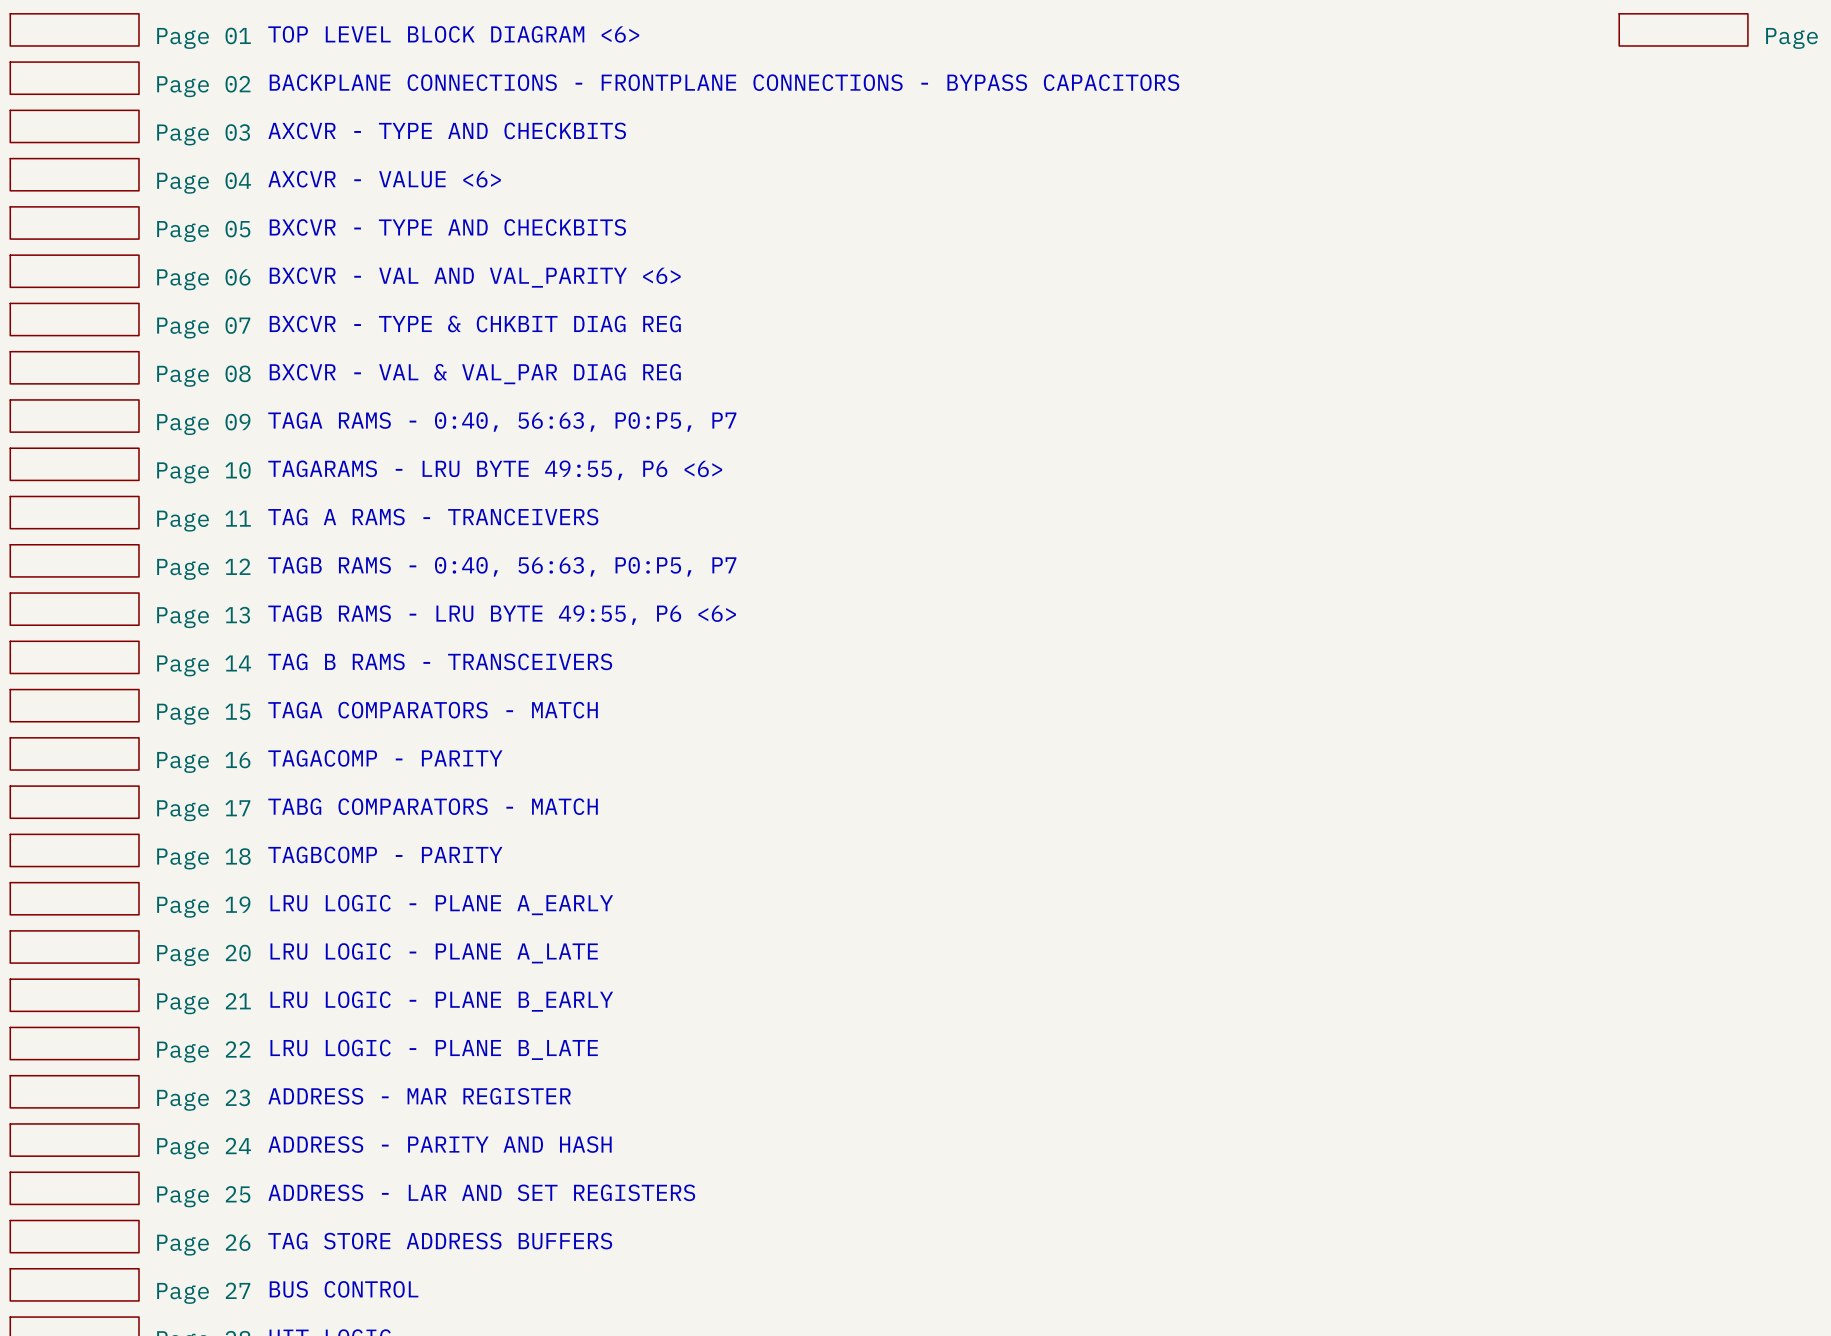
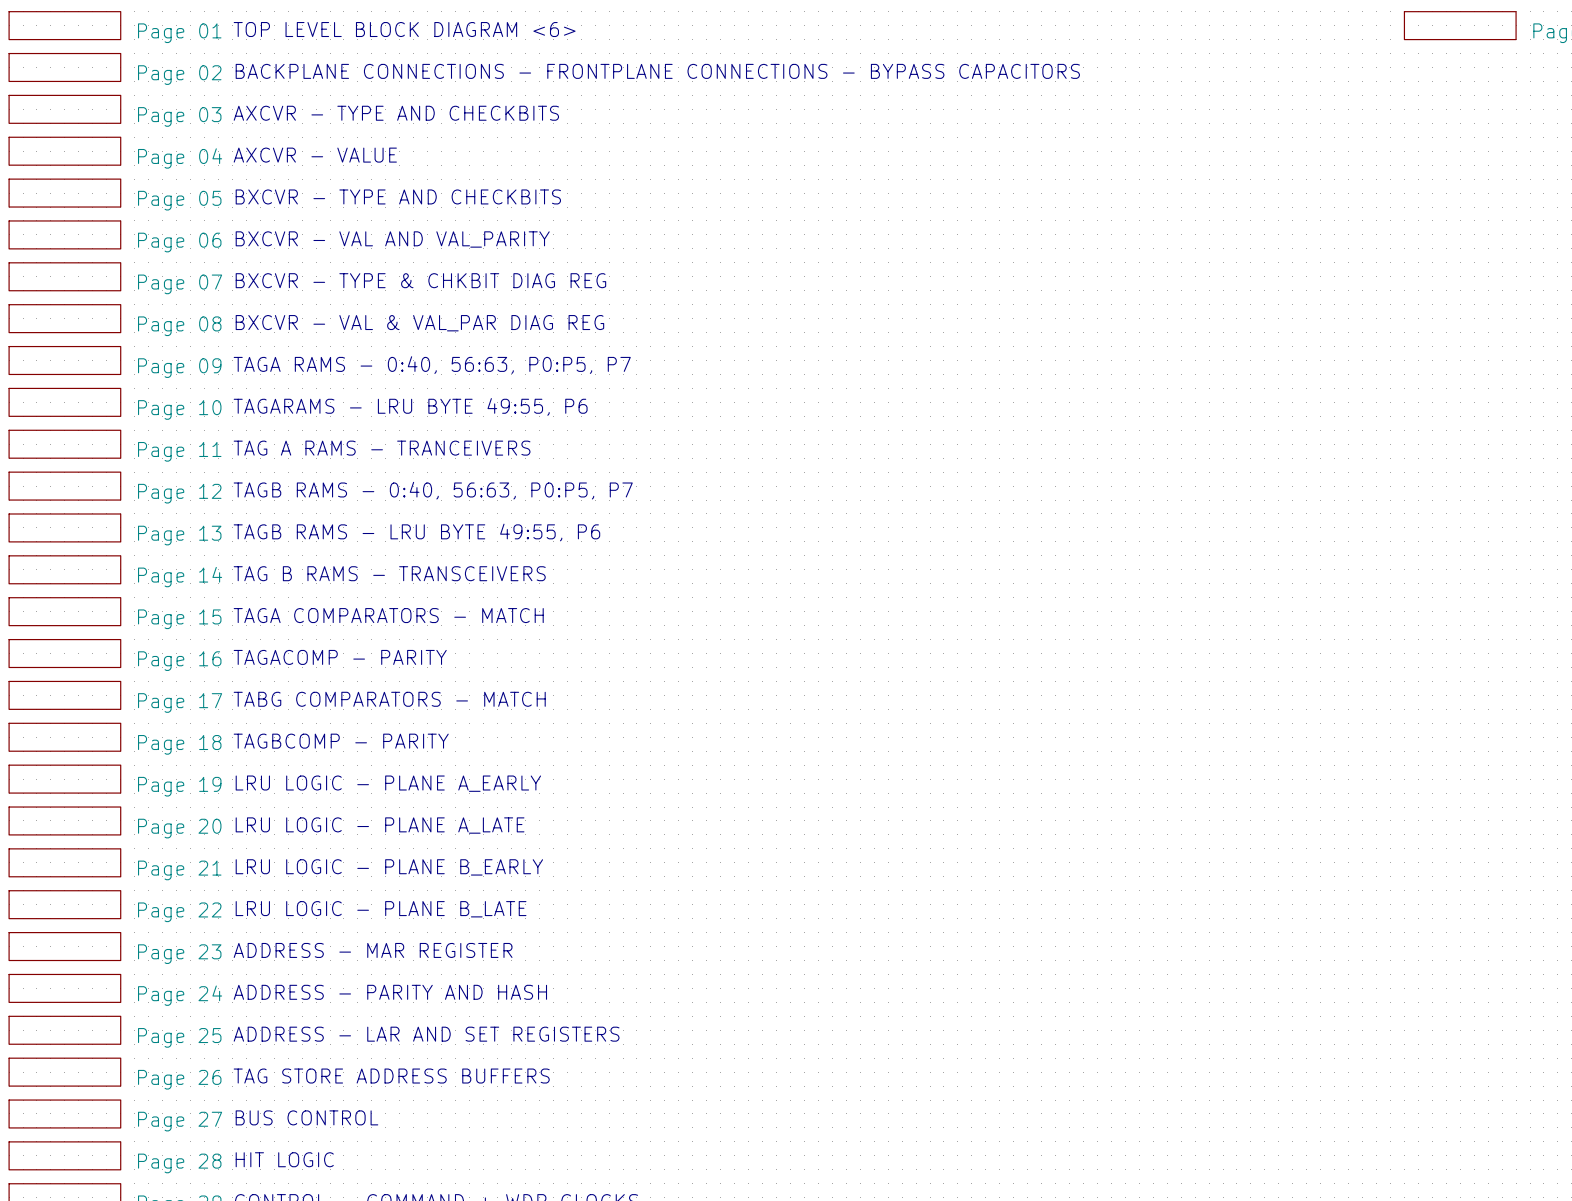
text: AXCVR - VALUE <6> (384, 179) -> AXCVR - VALUE (315, 155)
text: BXCVR - VAL AND VAL_PARITY <6> (475, 277) -> BXCVR - VAL AND VAL_PARITY (392, 239)
text: TAGARAMS - LRU BYTE 49:55, P6 <6> (495, 470) -> TAGARAMS - LRU BYTE 49:55, P6 (410, 406)
text: TAGB RAMS - LRU BYTE 49:55, P6 <6> (502, 615) -> TAGB RAMS - LRU BYTE 49:55, P6 (416, 532)

